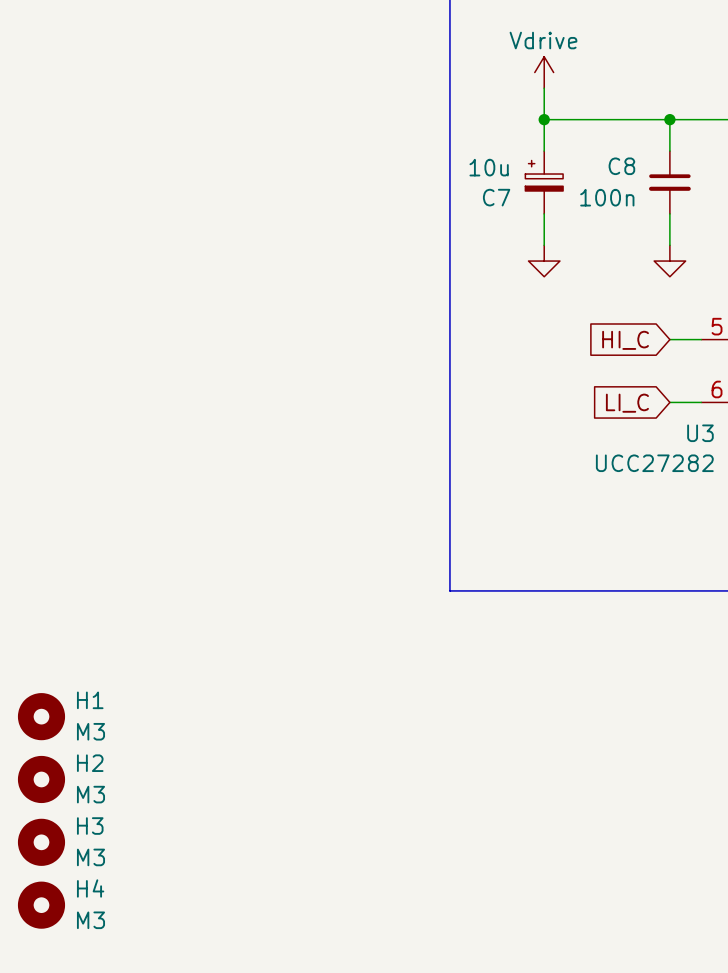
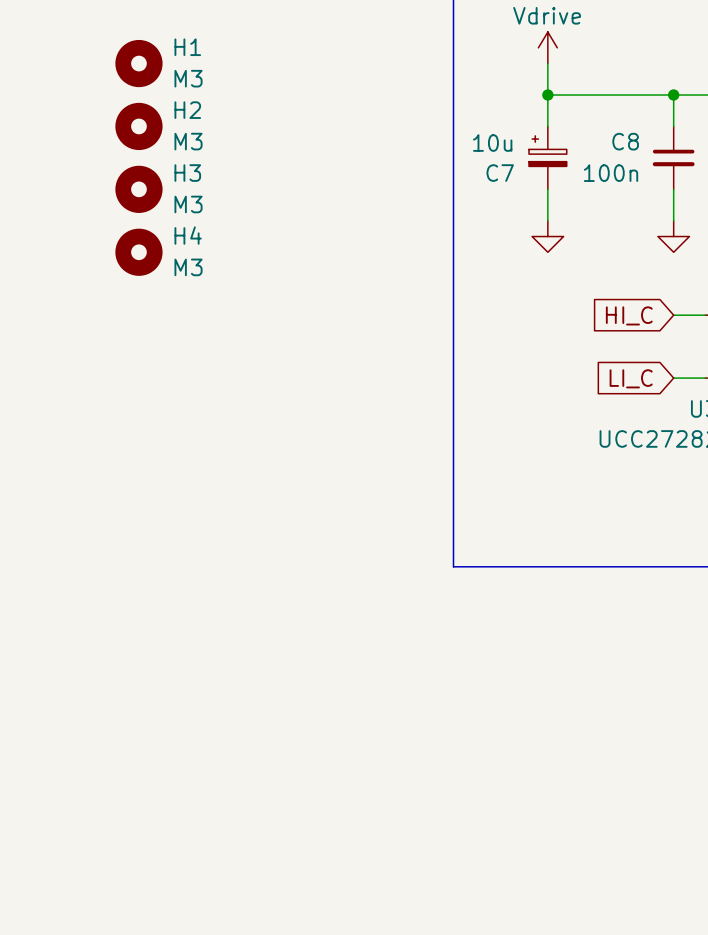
H1 position: (41, 716) -> (138, 63)
H2 position: (41, 779) -> (138, 126)
H3 position: (41, 842) -> (138, 189)
H4 position: (41, 905) -> (138, 252)

